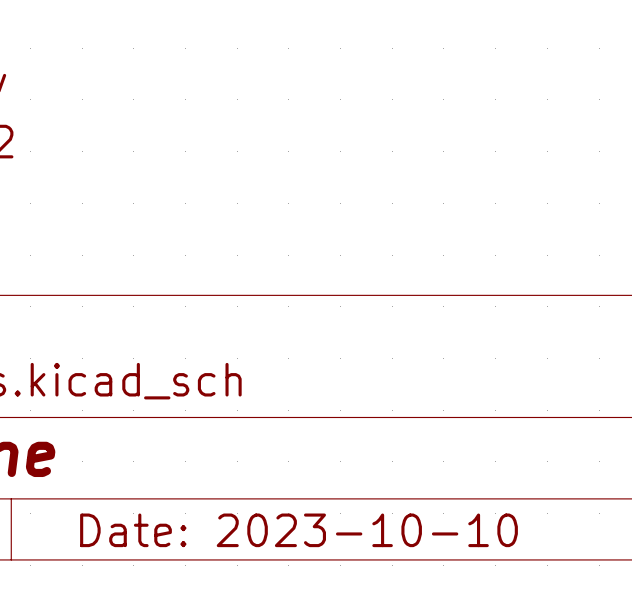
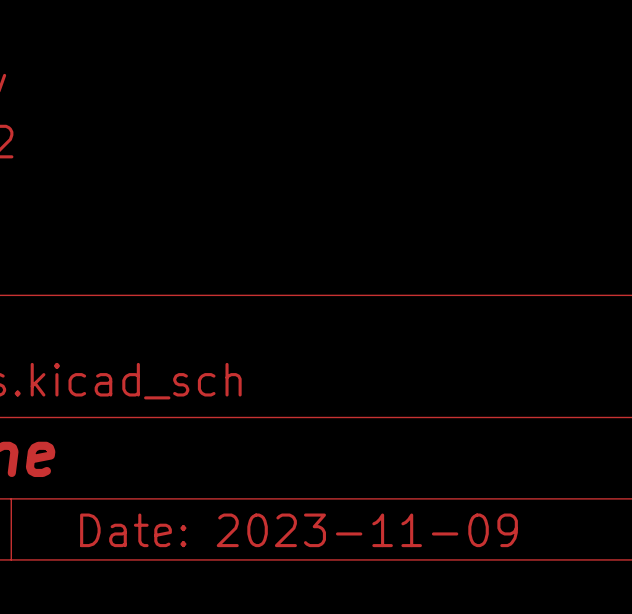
title block: Date: 2023-10-10 (298, 530) -> Date: 2023-11-09 (298, 530)

